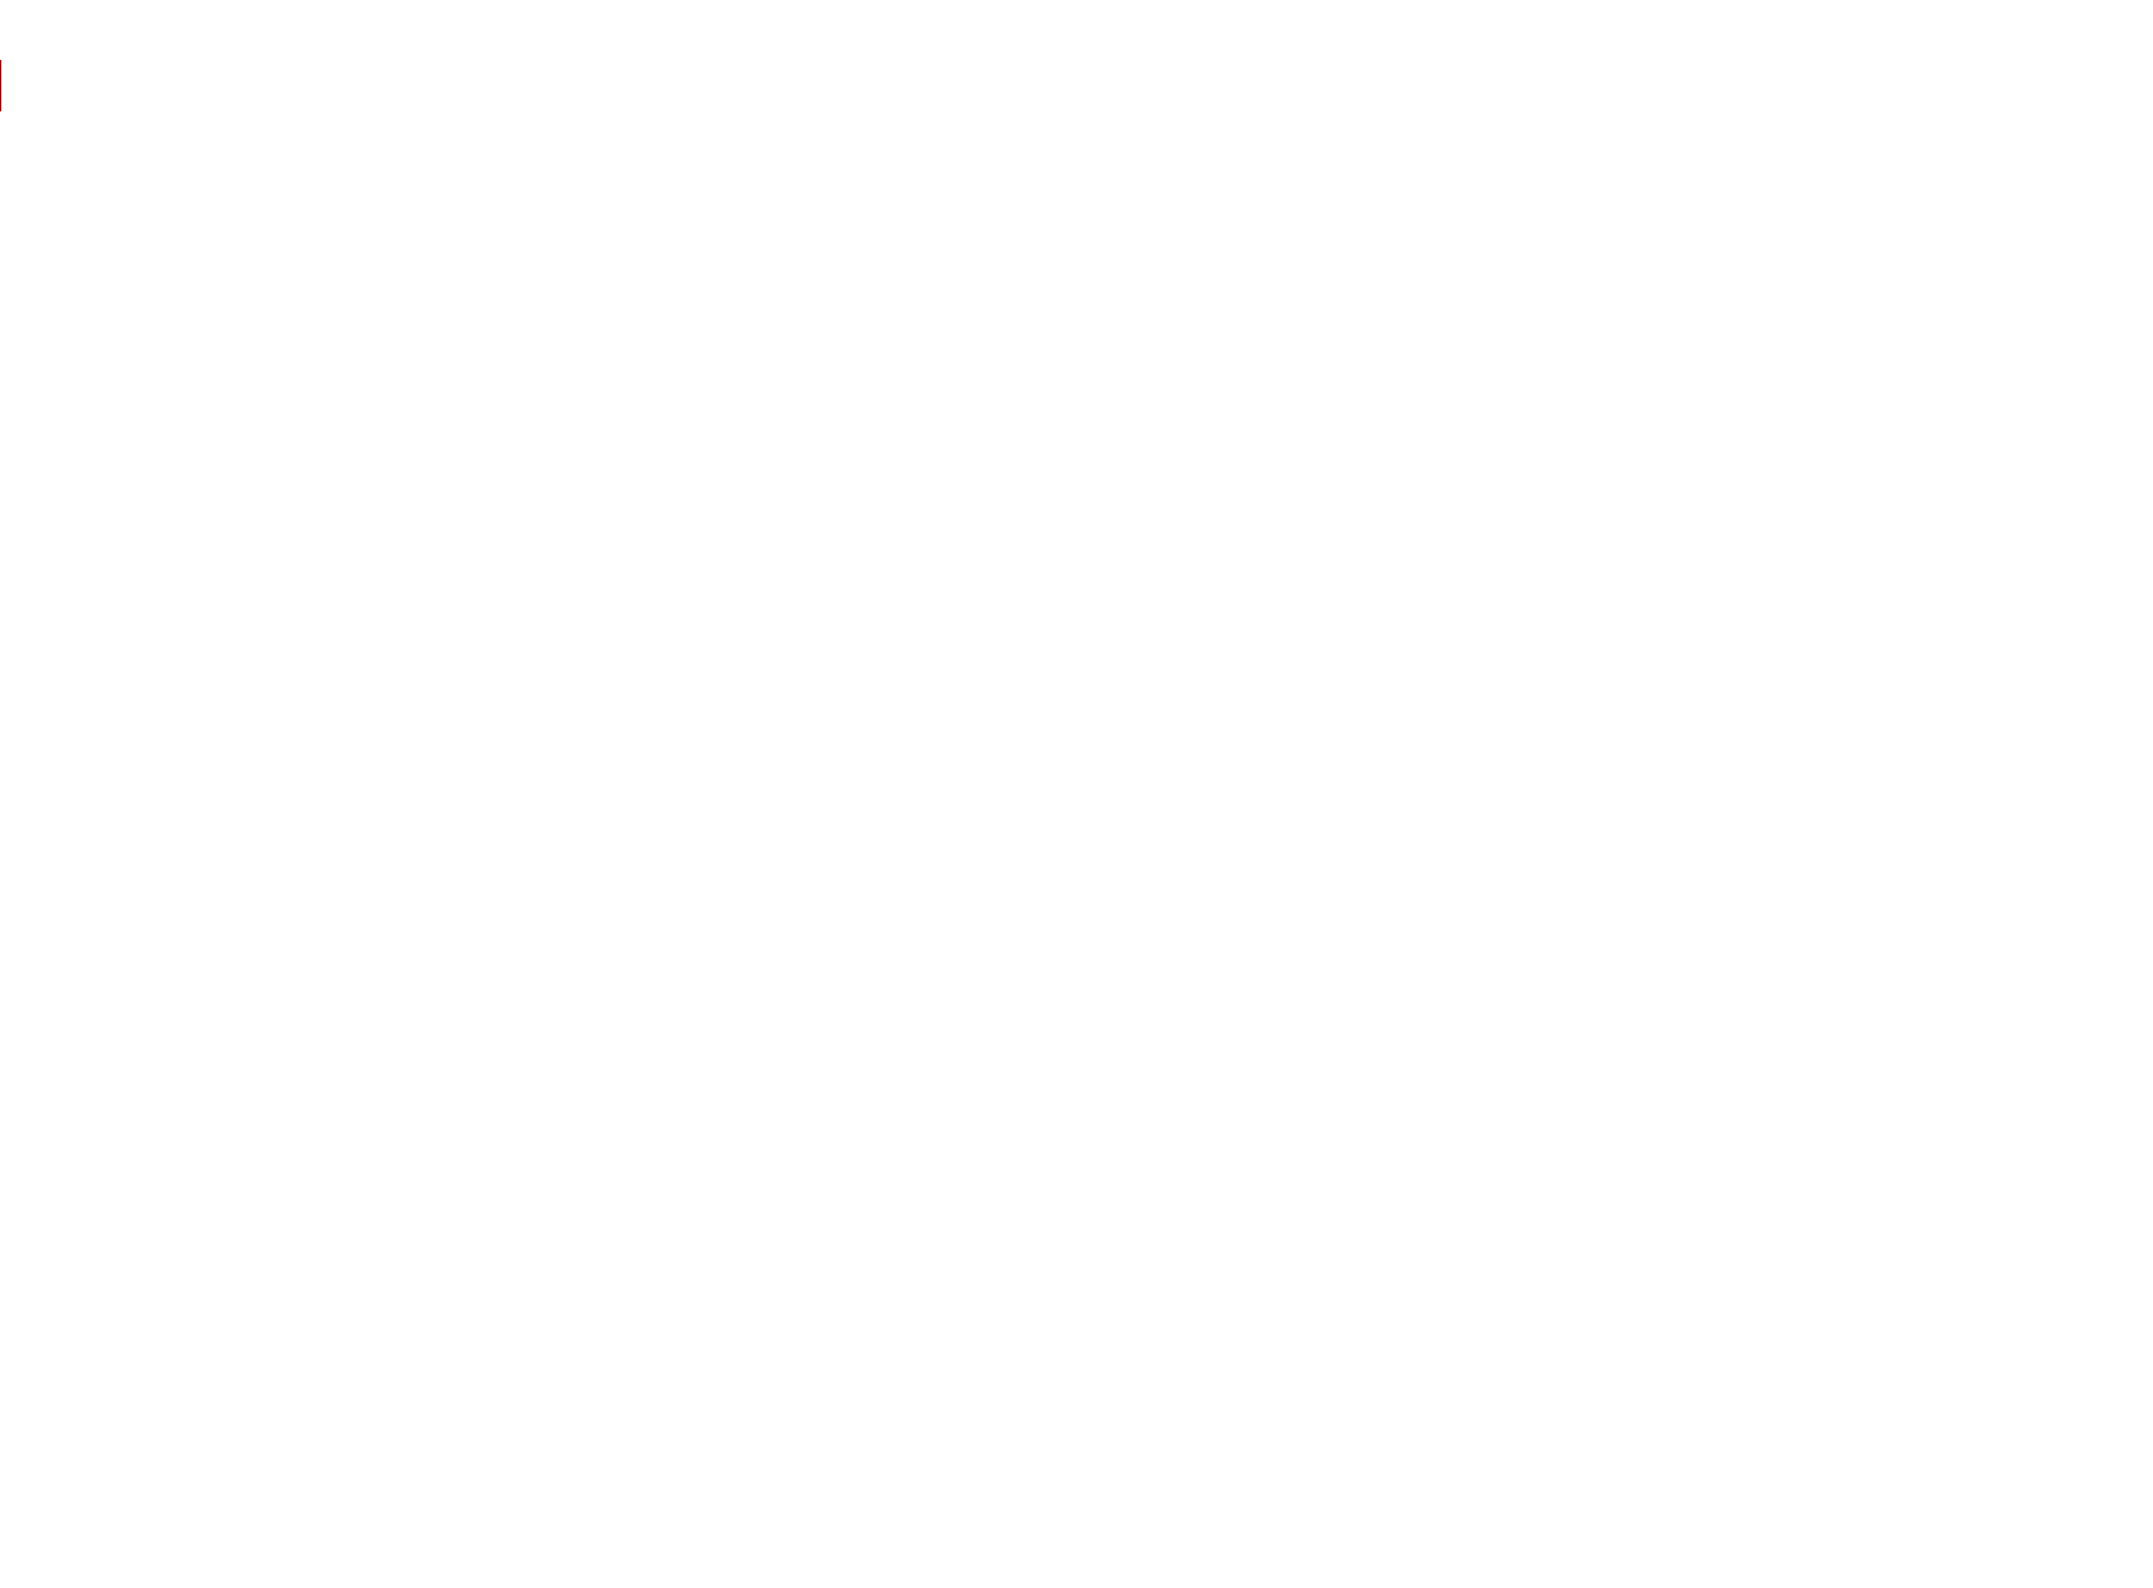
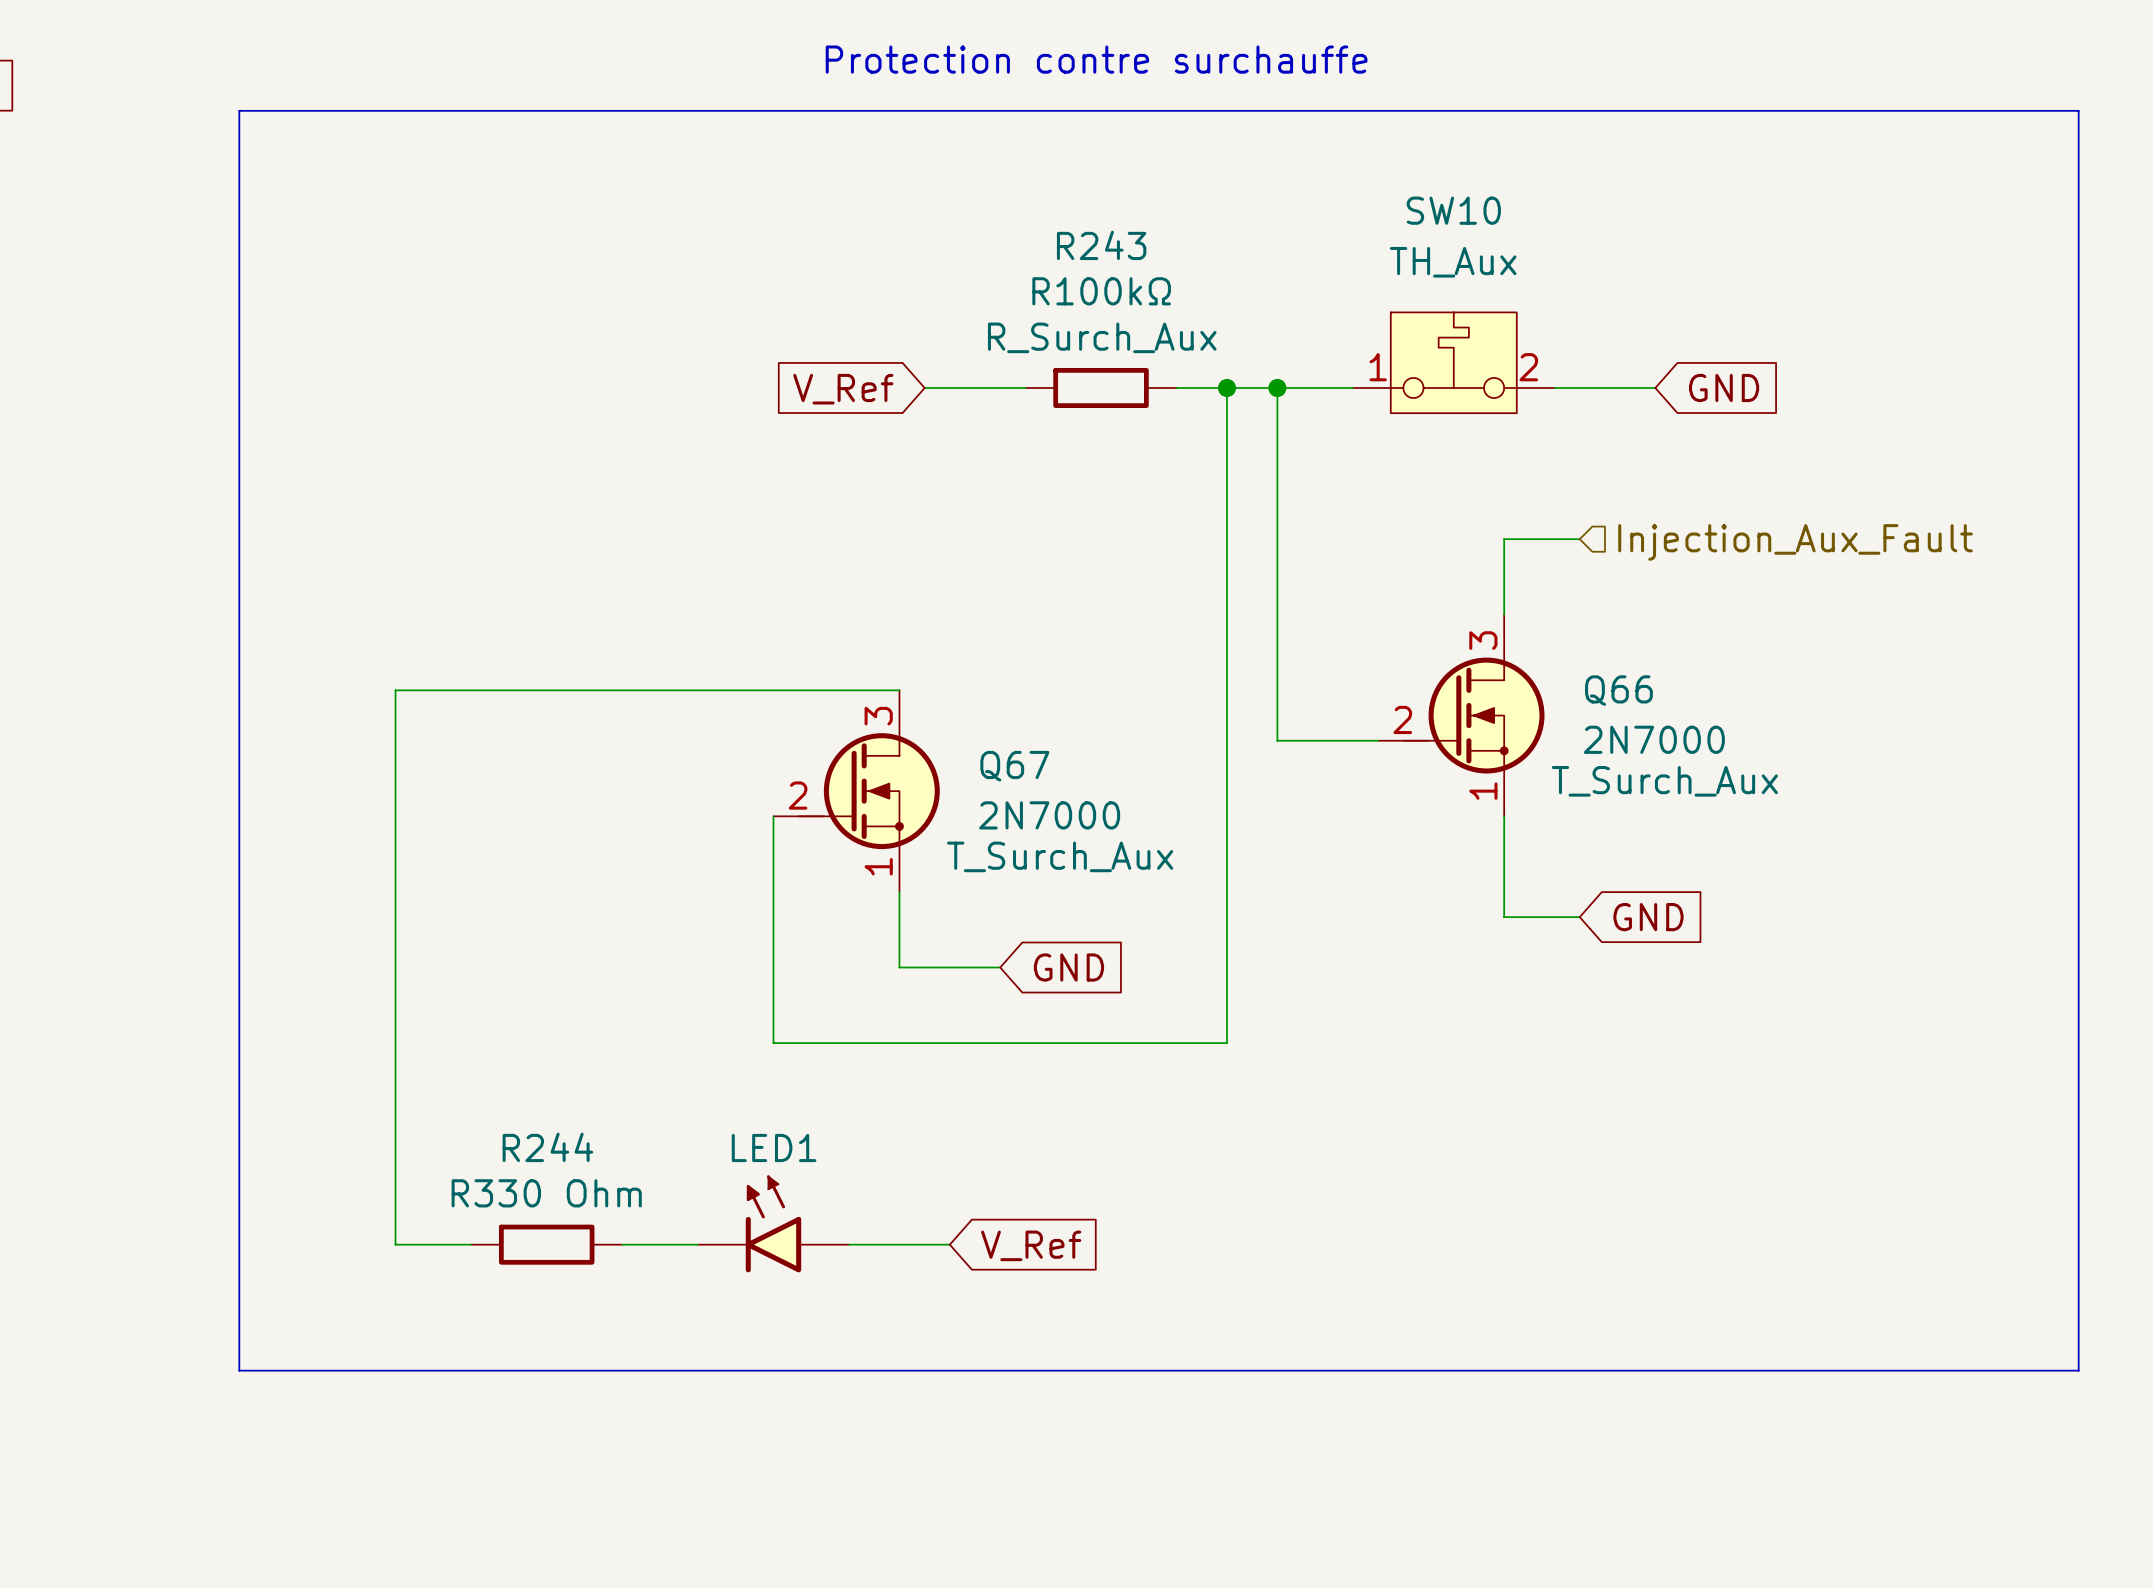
text: none -> Protection contre surchauffe (1096, 59)
line: none -> (239, 110) (2078, 110) (2078, 1370) (239, 1370) (239, 110)
SW10: none -> TH_Aux (1453, 362)
wire: none -> (924, 387) (1025, 387)
R243: none -> R100kΩ (1101, 387)
wire: none -> (1176, 387) (1353, 387)
wire: none -> (1227, 387) (1227, 1043) (773, 1043) (773, 816)
junction: none -> (1227, 387)
wire: none -> (1277, 387) (1277, 740) (1378, 740)
junction: none -> (1277, 387)
wire: none -> (1554, 387) (1655, 387)
global label: none -> GND (1724, 387)
global label: none -> V_Ref (843, 389)
wire: none -> (1579, 539) (1504, 539) (1504, 614)
hierarchical label: none -> Injection_Aux_Fault (1795, 542)
wire: none -> (899, 690) (395, 690) (395, 1244) (471, 1244)
Q66: none -> 2N7000 (1461, 715)
Q67: none -> 2N7000 (856, 791)
wire: none -> (1504, 816) (1504, 917) (1579, 917)
wire: none -> (899, 891) (899, 967) (1000, 967)
global label: none -> GND (1648, 917)
global label: none -> GND (1068, 967)
LED1: none -> (773, 1223)
R244: none -> R330 Ohm (546, 1244)
wire: none -> (622, 1244) (697, 1244)
wire: none -> (849, 1244) (949, 1244)
global label: none -> V_Ref (1031, 1245)

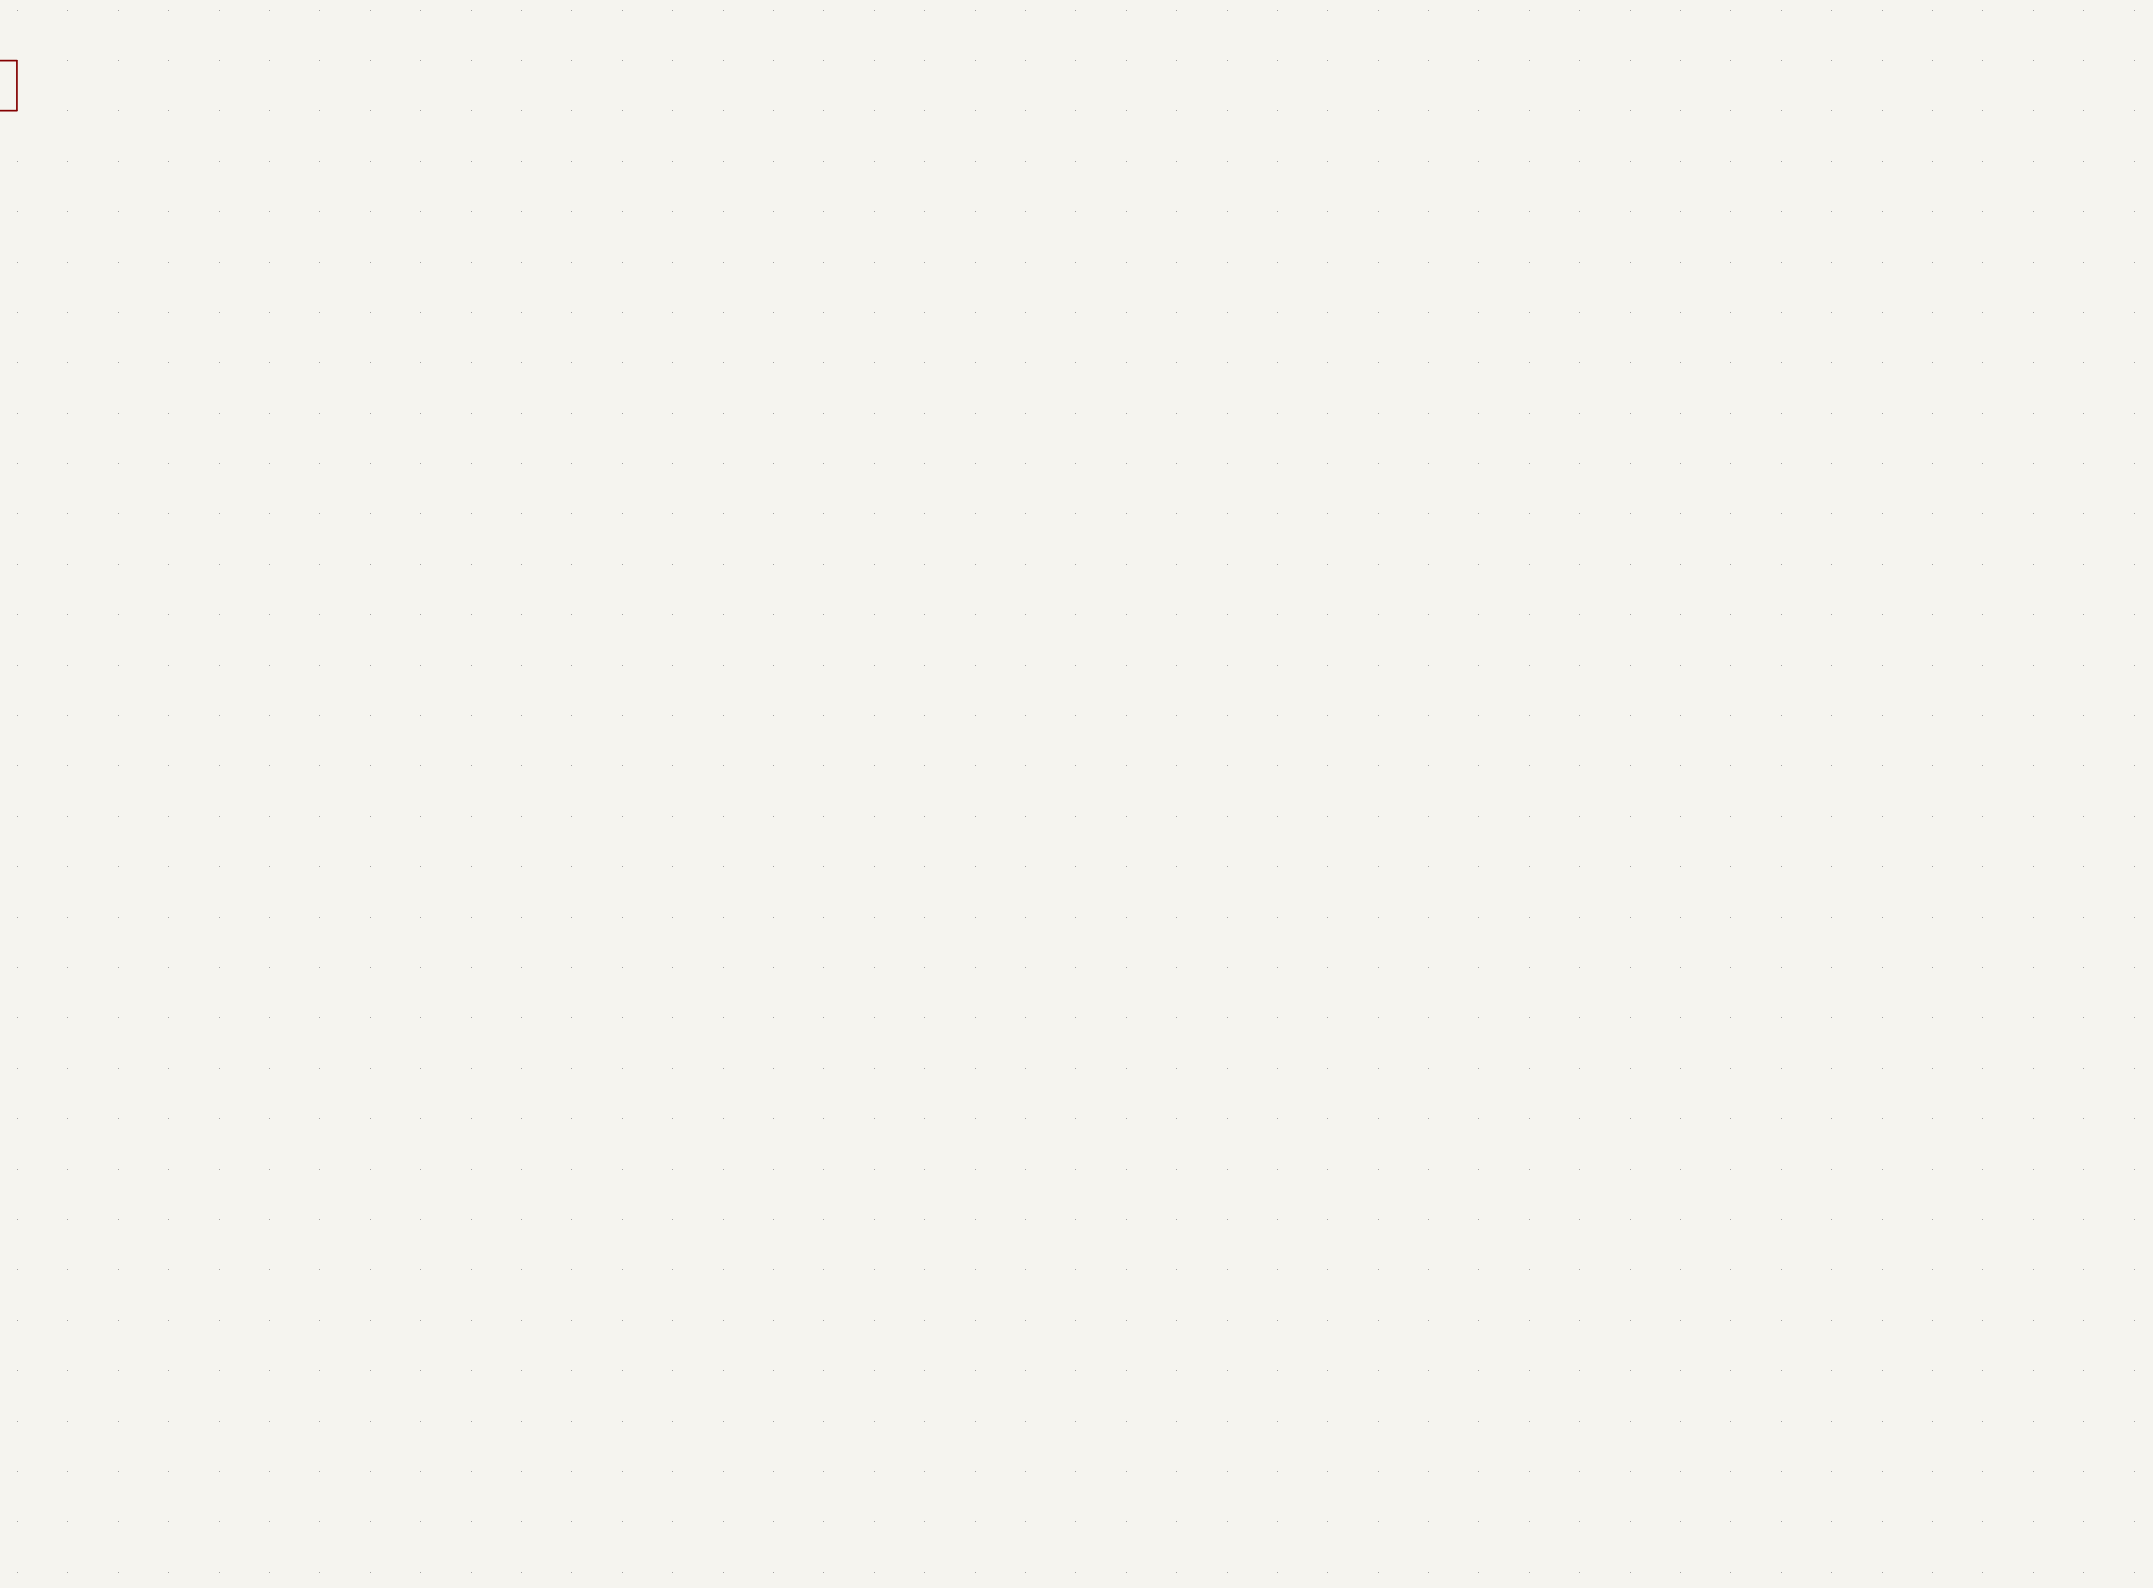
text: Protection contre surchauffe (1096, 59) -> none
line: (239, 110) (2078, 110) (2078, 1370) (239, 1370) (239, 110) -> none
SW10: TH_Aux (1453, 362) -> none
wire: (924, 387) (1025, 387) -> none
R243: R100kΩ (1101, 387) -> none
wire: (1176, 387) (1353, 387) -> none
wire: (1227, 387) (1227, 1043) (773, 1043) (773, 816) -> none
junction: (1227, 387) -> none
wire: (1277, 387) (1277, 740) (1378, 740) -> none
junction: (1277, 387) -> none
wire: (1554, 387) (1655, 387) -> none
global label: GND (1724, 387) -> none
global label: V_Ref (843, 389) -> none
wire: (1579, 539) (1504, 539) (1504, 614) -> none
hierarchical label: Injection_Aux_Fault (1795, 542) -> none
wire: (899, 690) (395, 690) (395, 1244) (471, 1244) -> none
Q66: 2N7000 (1461, 715) -> none
Q67: 2N7000 (856, 791) -> none
wire: (1504, 816) (1504, 917) (1579, 917) -> none
wire: (899, 891) (899, 967) (1000, 967) -> none
global label: GND (1648, 917) -> none
global label: GND (1068, 967) -> none
LED1: (773, 1223) -> none
R244: R330 Ohm (546, 1244) -> none
wire: (622, 1244) (697, 1244) -> none
wire: (849, 1244) (949, 1244) -> none
global label: V_Ref (1031, 1245) -> none

